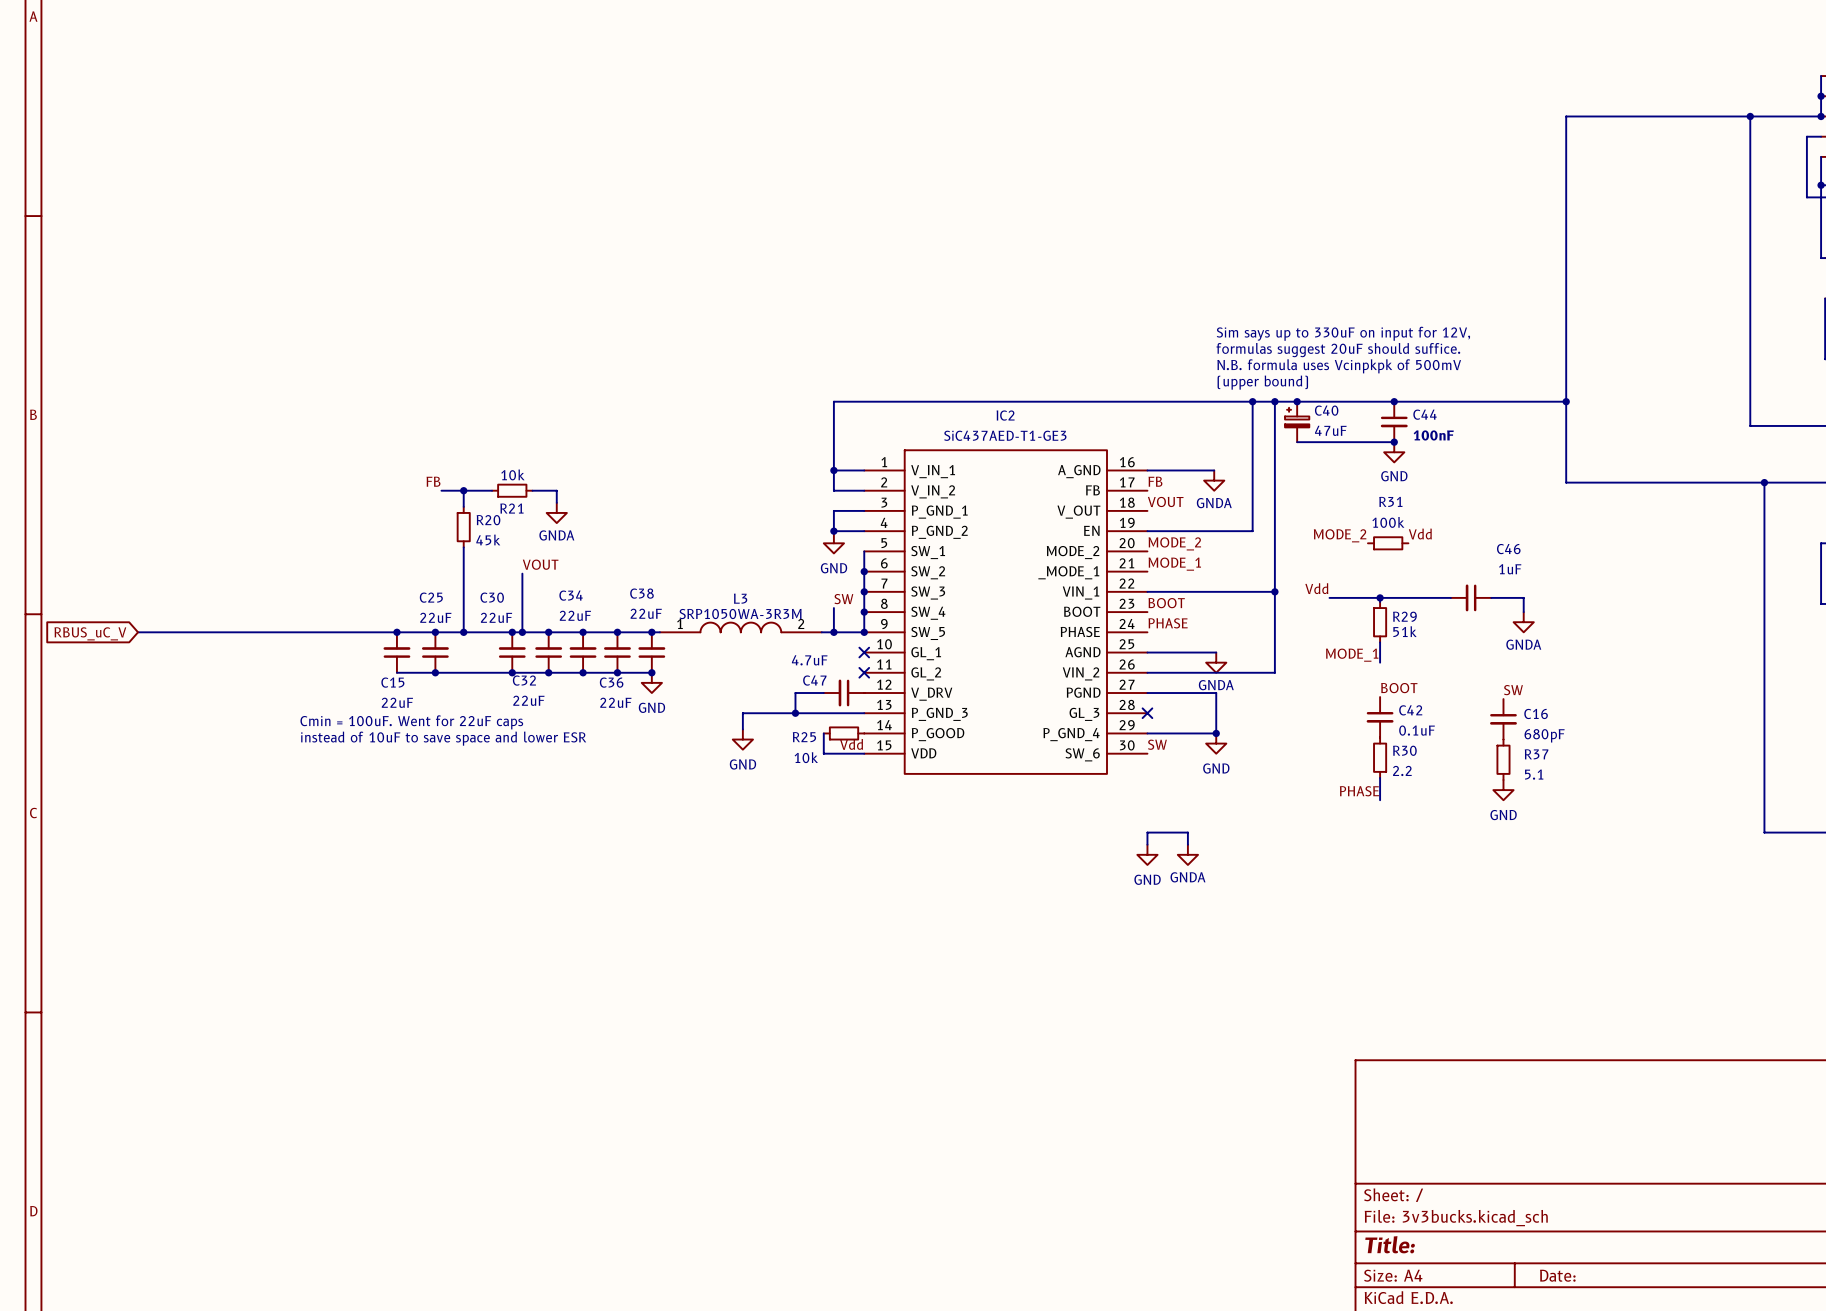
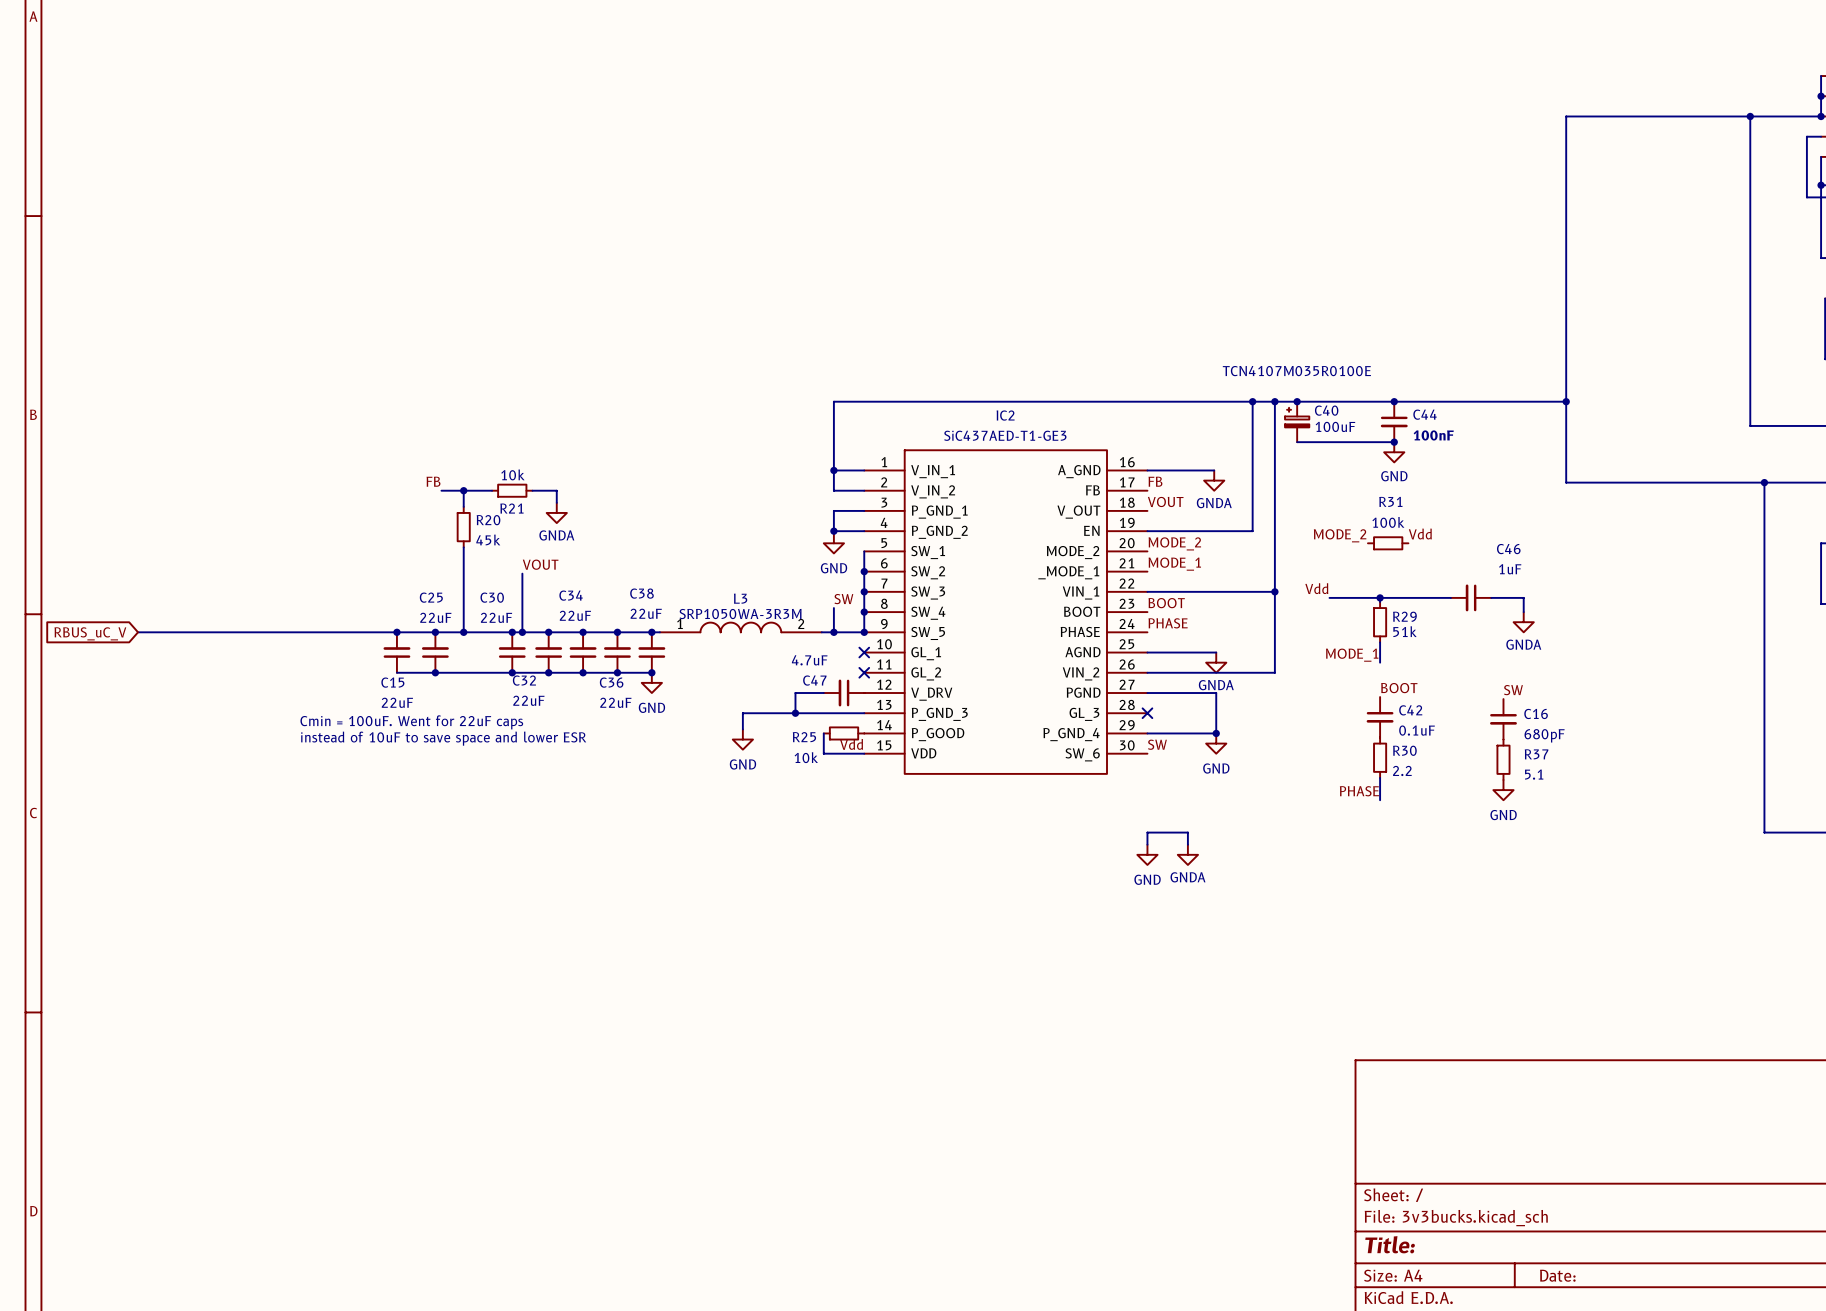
text: Sim says up to 330uF on input for 12V, (1343, 333) -> none
text: formulas suggest 20uF should suffice. (1338, 350) -> none
text: N.B. formula uses Vcinpkpk of 500mV (1339, 366) -> none
text: none -> TCN4107M035R0100E (1296, 371)
text: (upper bound) (1262, 382) -> none
C40 value: 47uF (1330, 430) -> 100uF (1335, 426)

